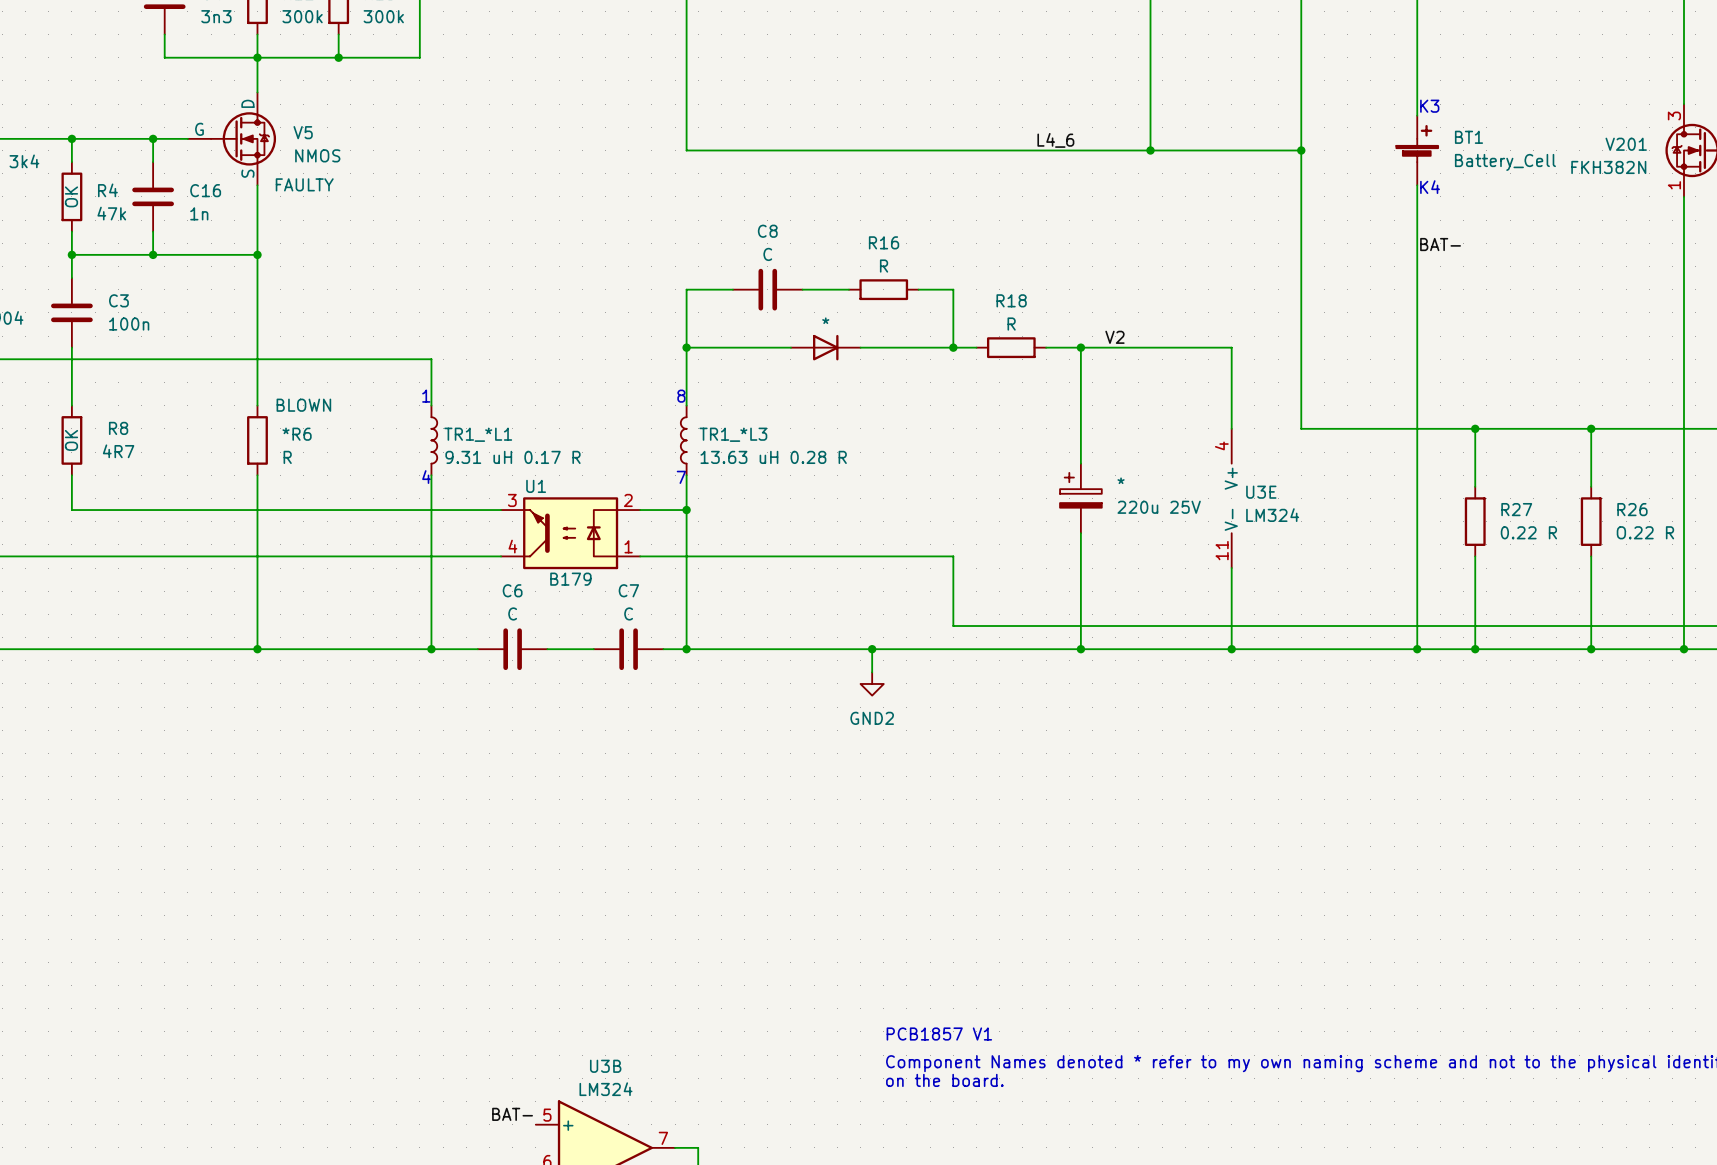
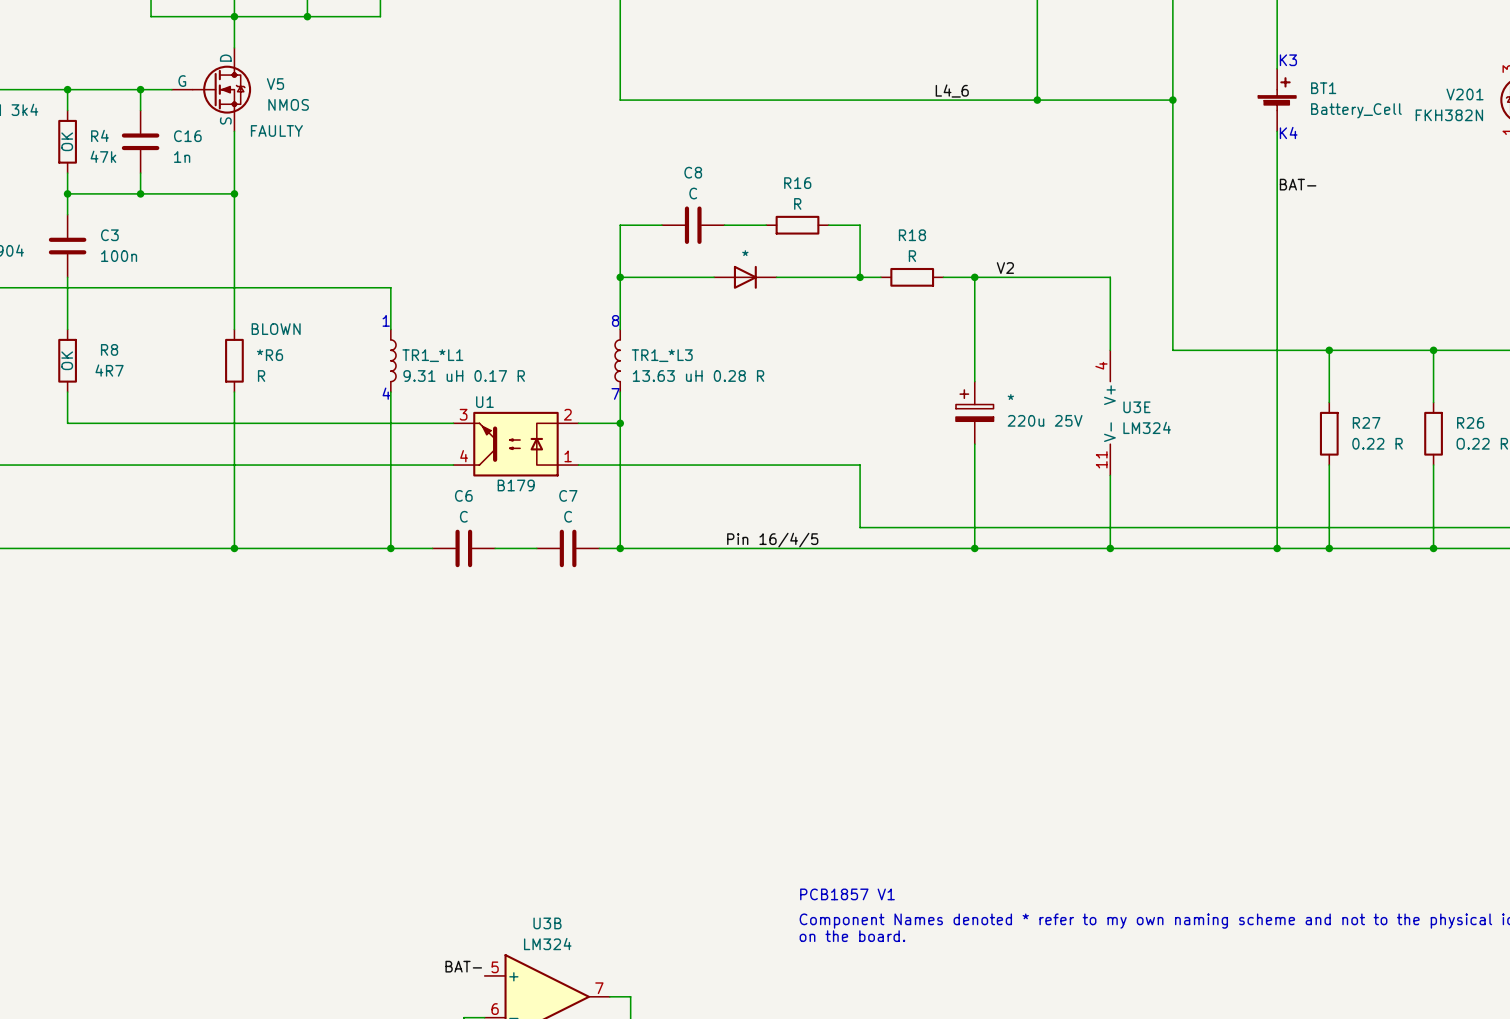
label: none -> Pin 16/4/5 (772, 540)
wire: (872, 649) (872, 672) -> none
junction: (872, 649) -> none
power symbol: GND2 (872, 683) -> none

